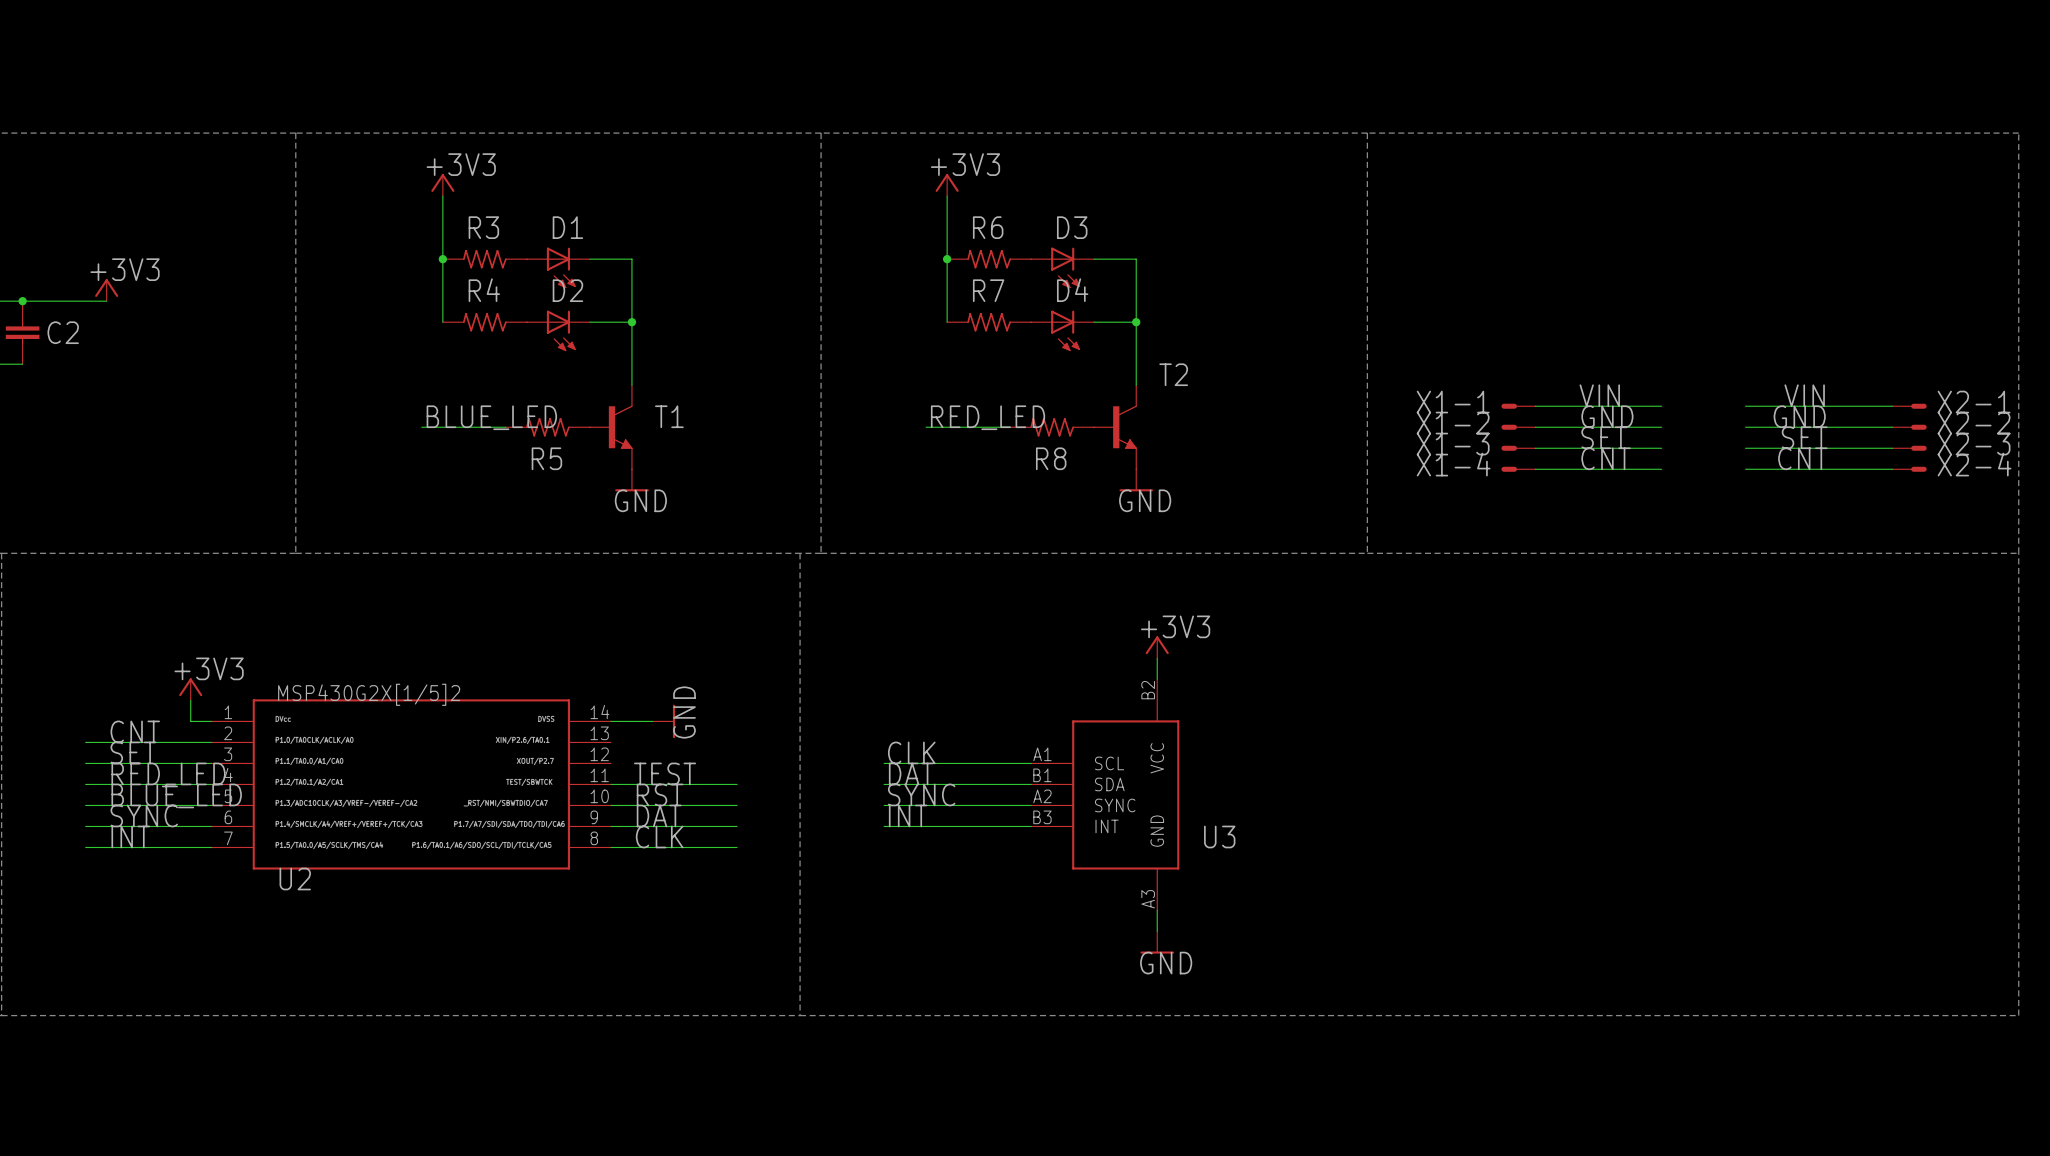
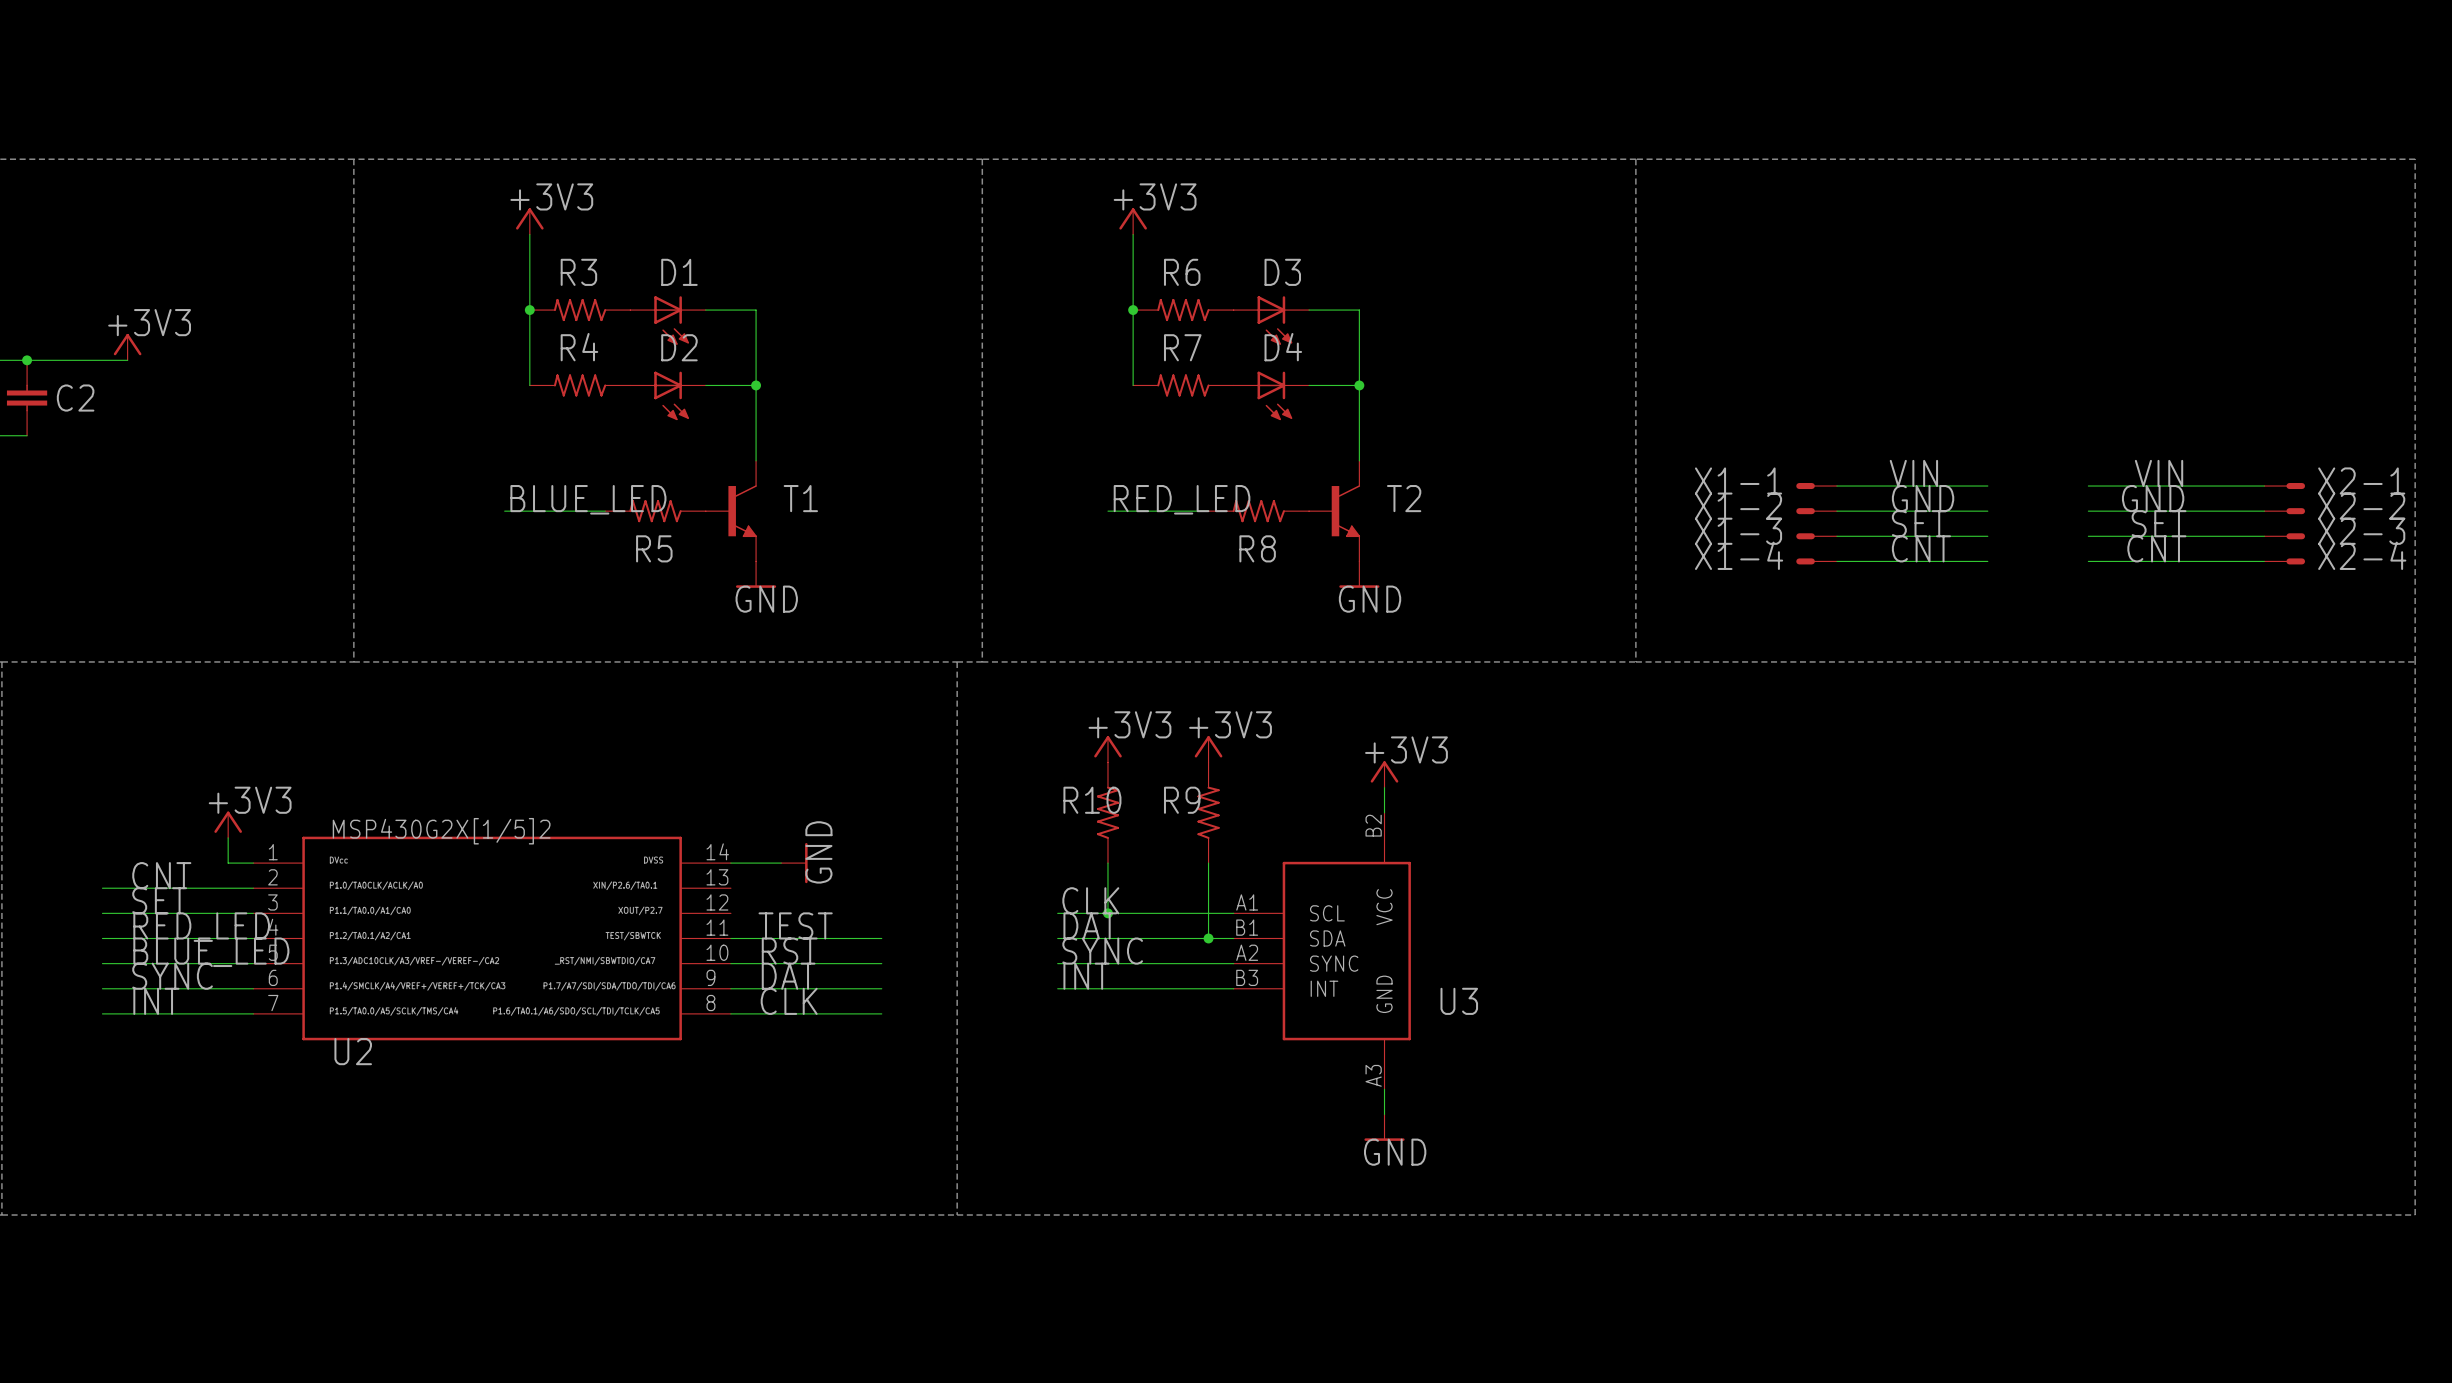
T2 name position: T2 (1173, 374) -> T2 (1404, 498)
power symbol: none -> +3V3 (1107, 749)
power symbol: none -> +3V3 (1208, 749)
R10: none -> (1107, 812)
R9: none -> (1208, 812)
wire: none -> (1107, 863) (1107, 913)
wire: none -> (1208, 863) (1208, 938)
junction: none -> (1107, 913)
junction: none -> (1208, 938)

